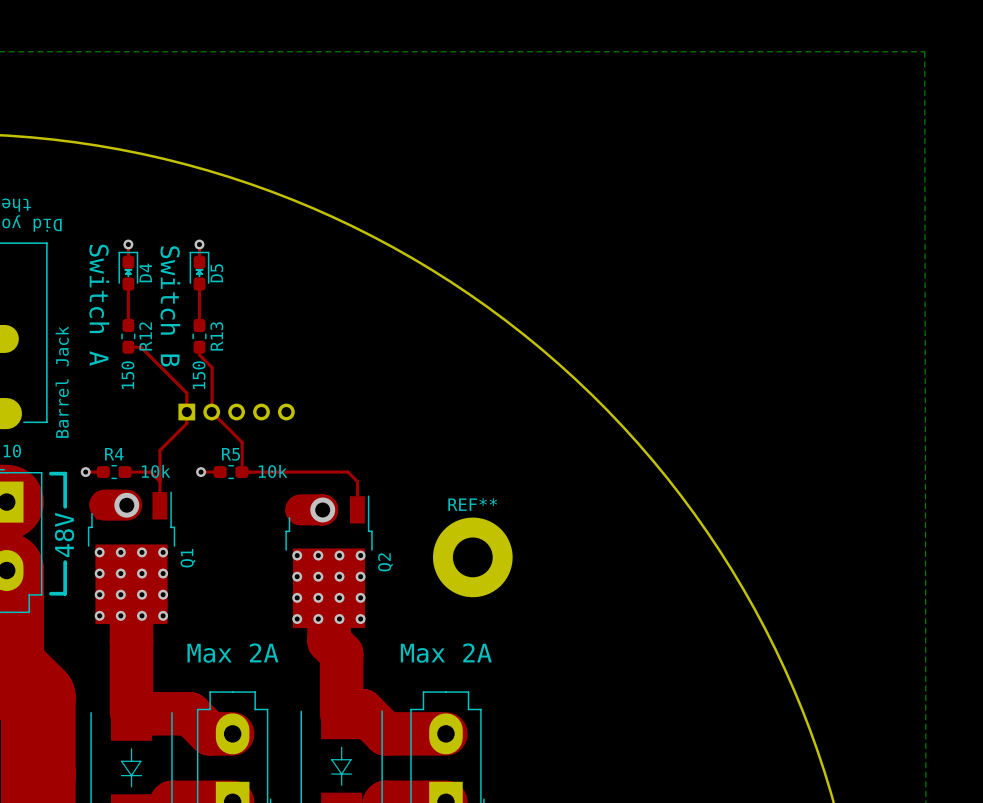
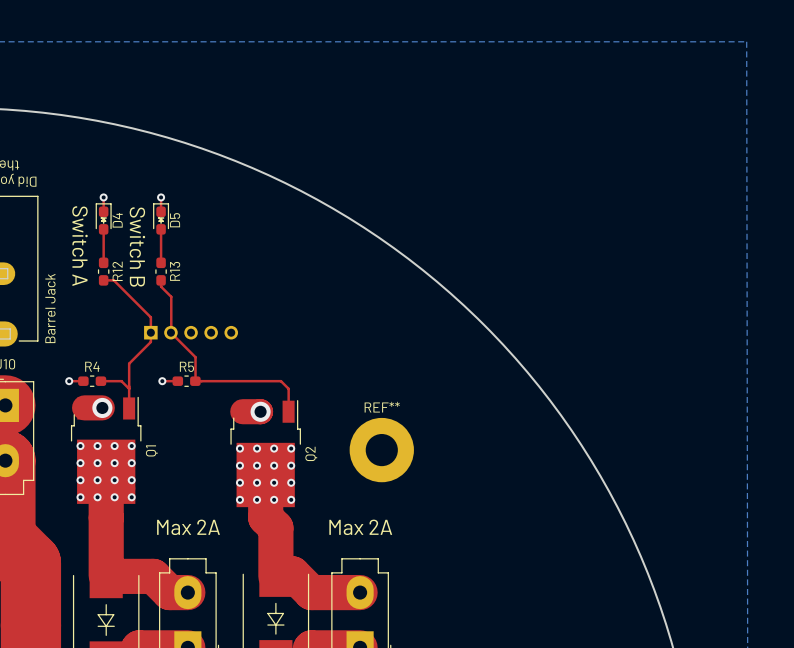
R12 value: 150 (127, 375) -> none
R13 value: 150 (199, 375) -> none
R4 value: 10k (156, 471) -> none
R5 value: 10k (273, 471) -> none
line: (50, 473) (65, 473) (65, 506) -> none
text: 48V (64, 534) -> none
line: (65, 562) (65, 593) (50, 593) -> none

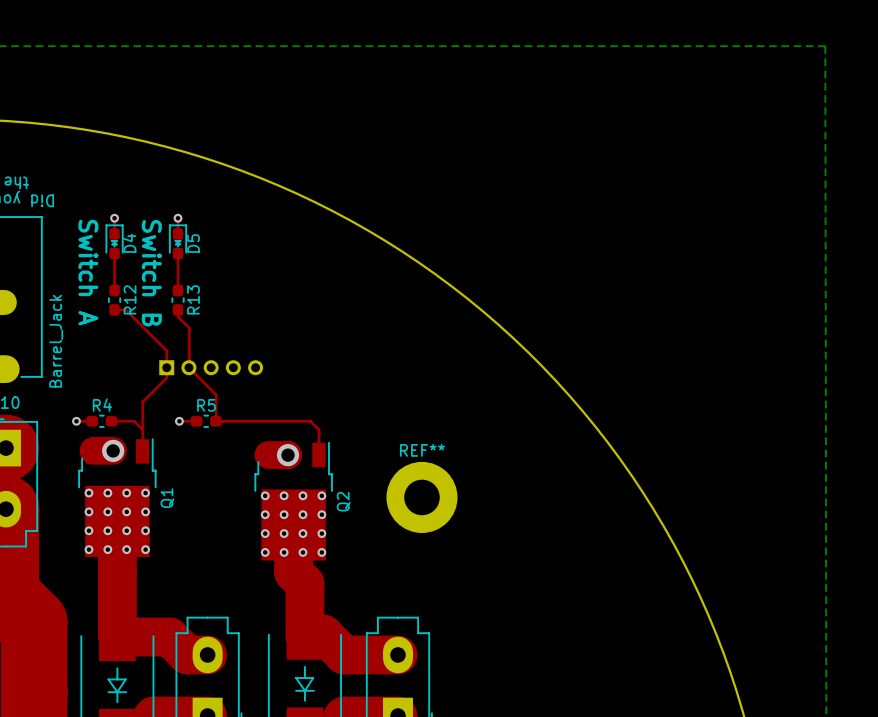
part value: Barrel Jack (50, 308) -> Barrel_Jack (56, 341)
text: Max 2A (188, 527) -> none
text: Max 2A (360, 527) -> none

